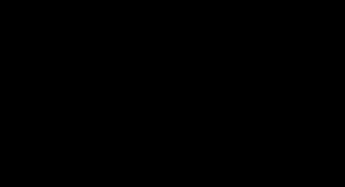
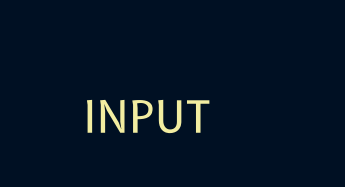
text: none -> INPUT (148, 116)

